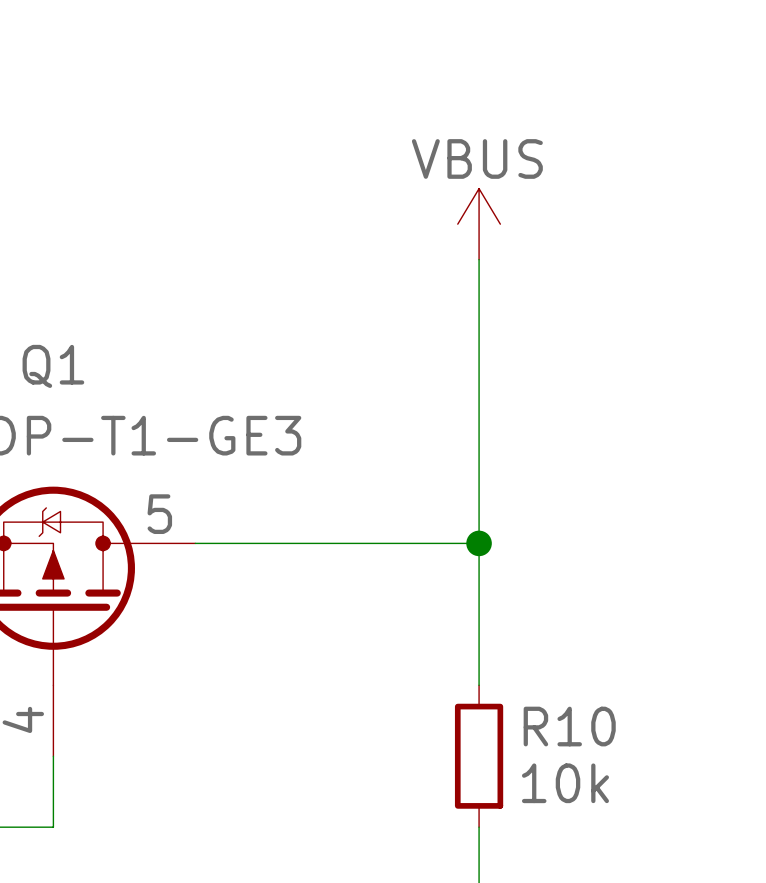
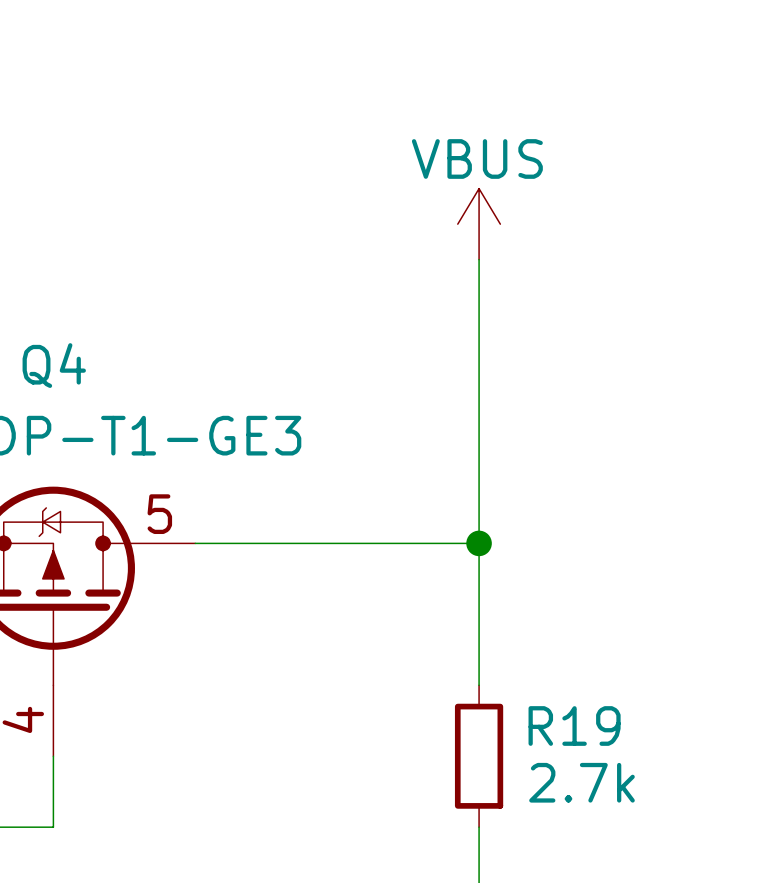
Q1 name: Q1 (53, 366) -> Q4 (54, 365)
R10 name: R10 (569, 726) -> R19 (574, 726)
R10 value: 10k (565, 783) -> 2.7k (582, 782)

